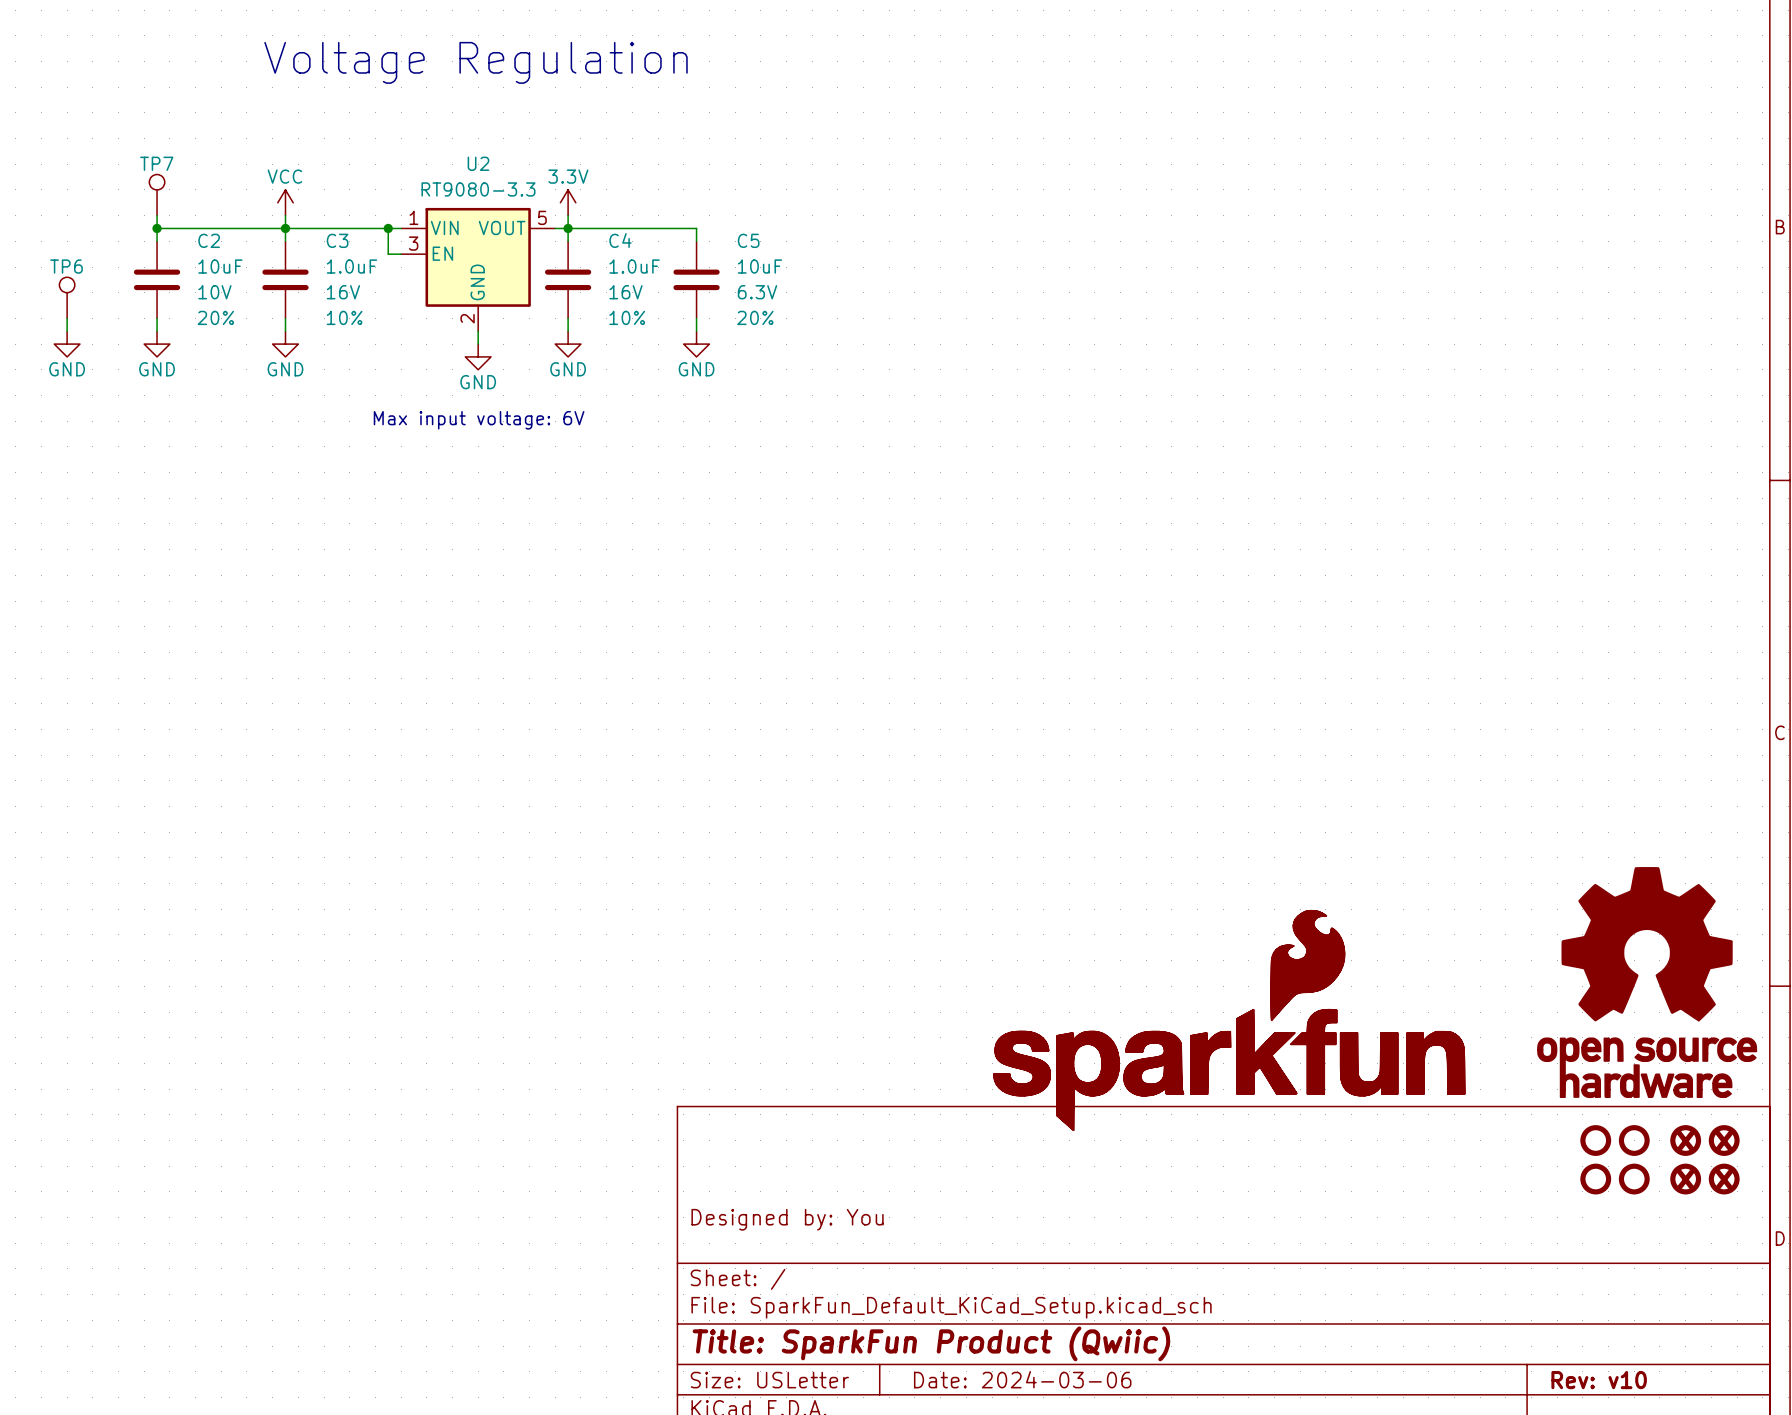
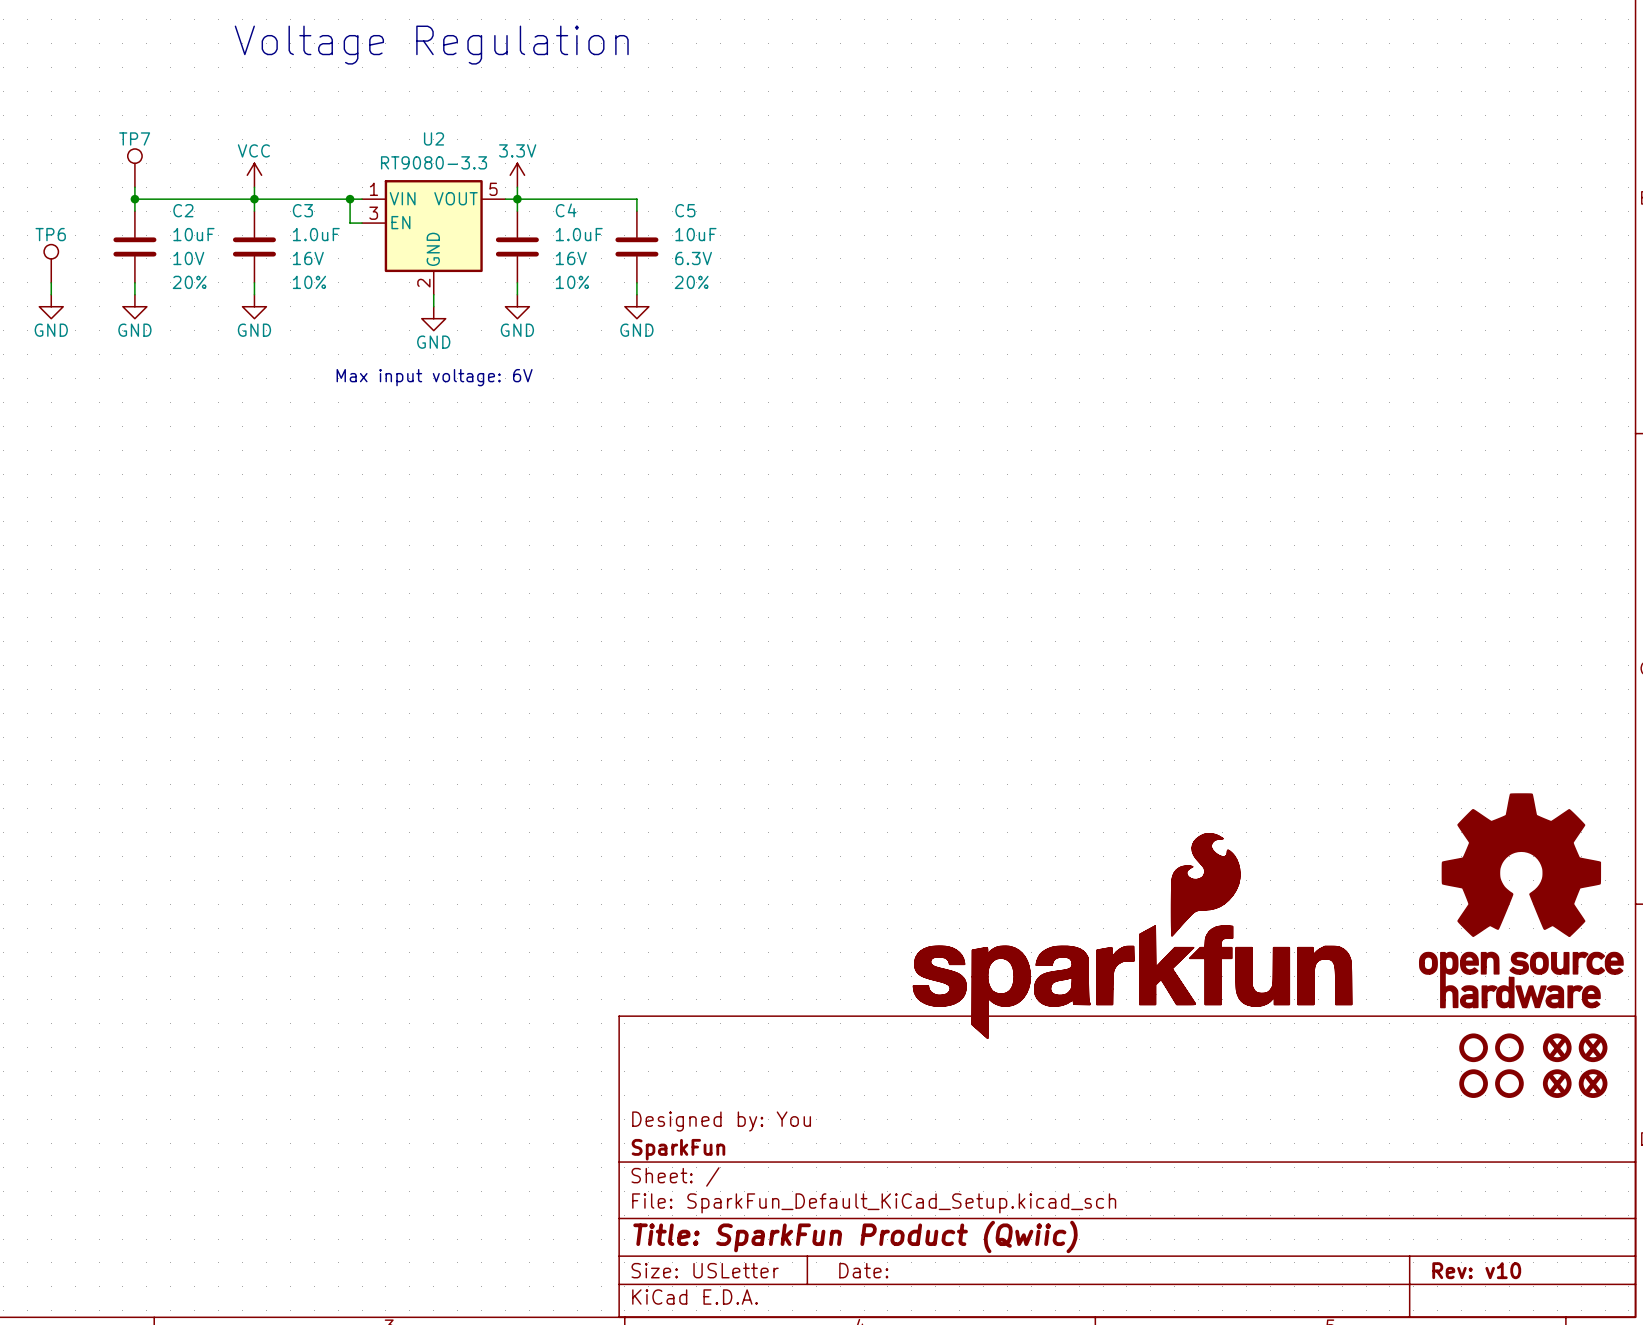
title block: none -> SparkFun (678, 1149)
title block: Date: 2024-03-06 (1022, 1379) -> Date: (863, 1270)

